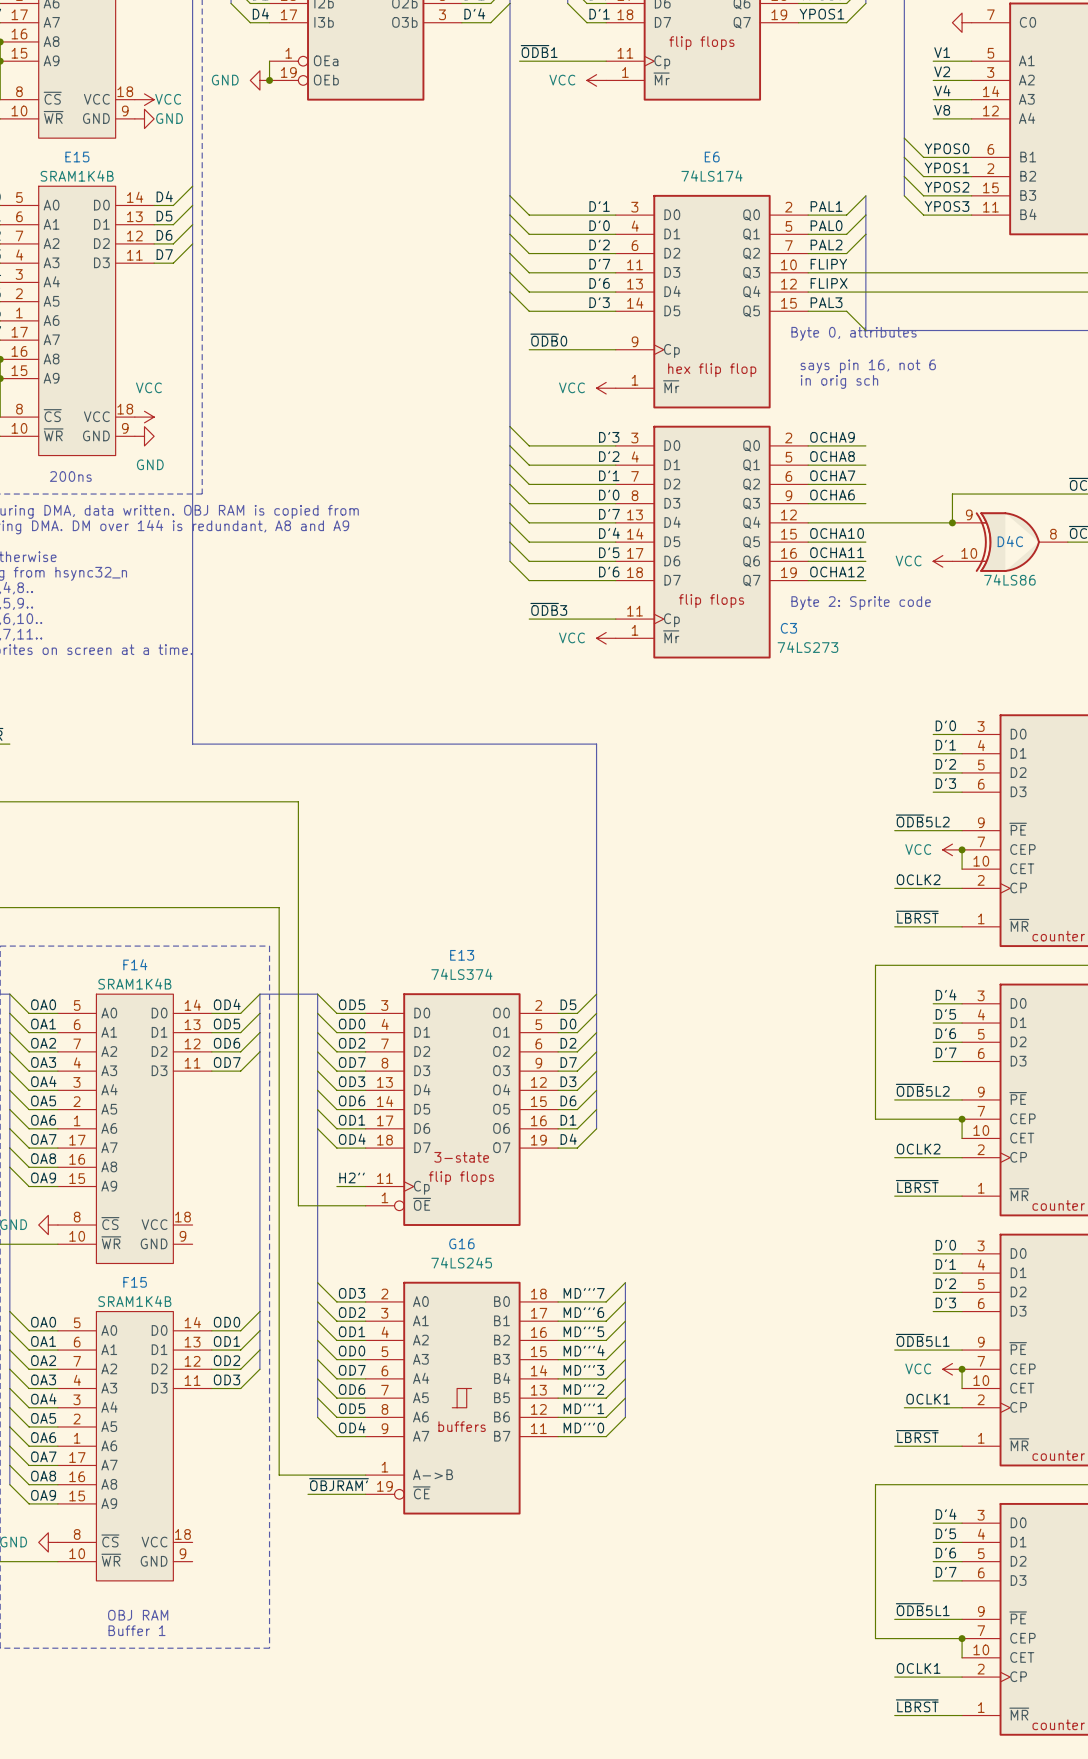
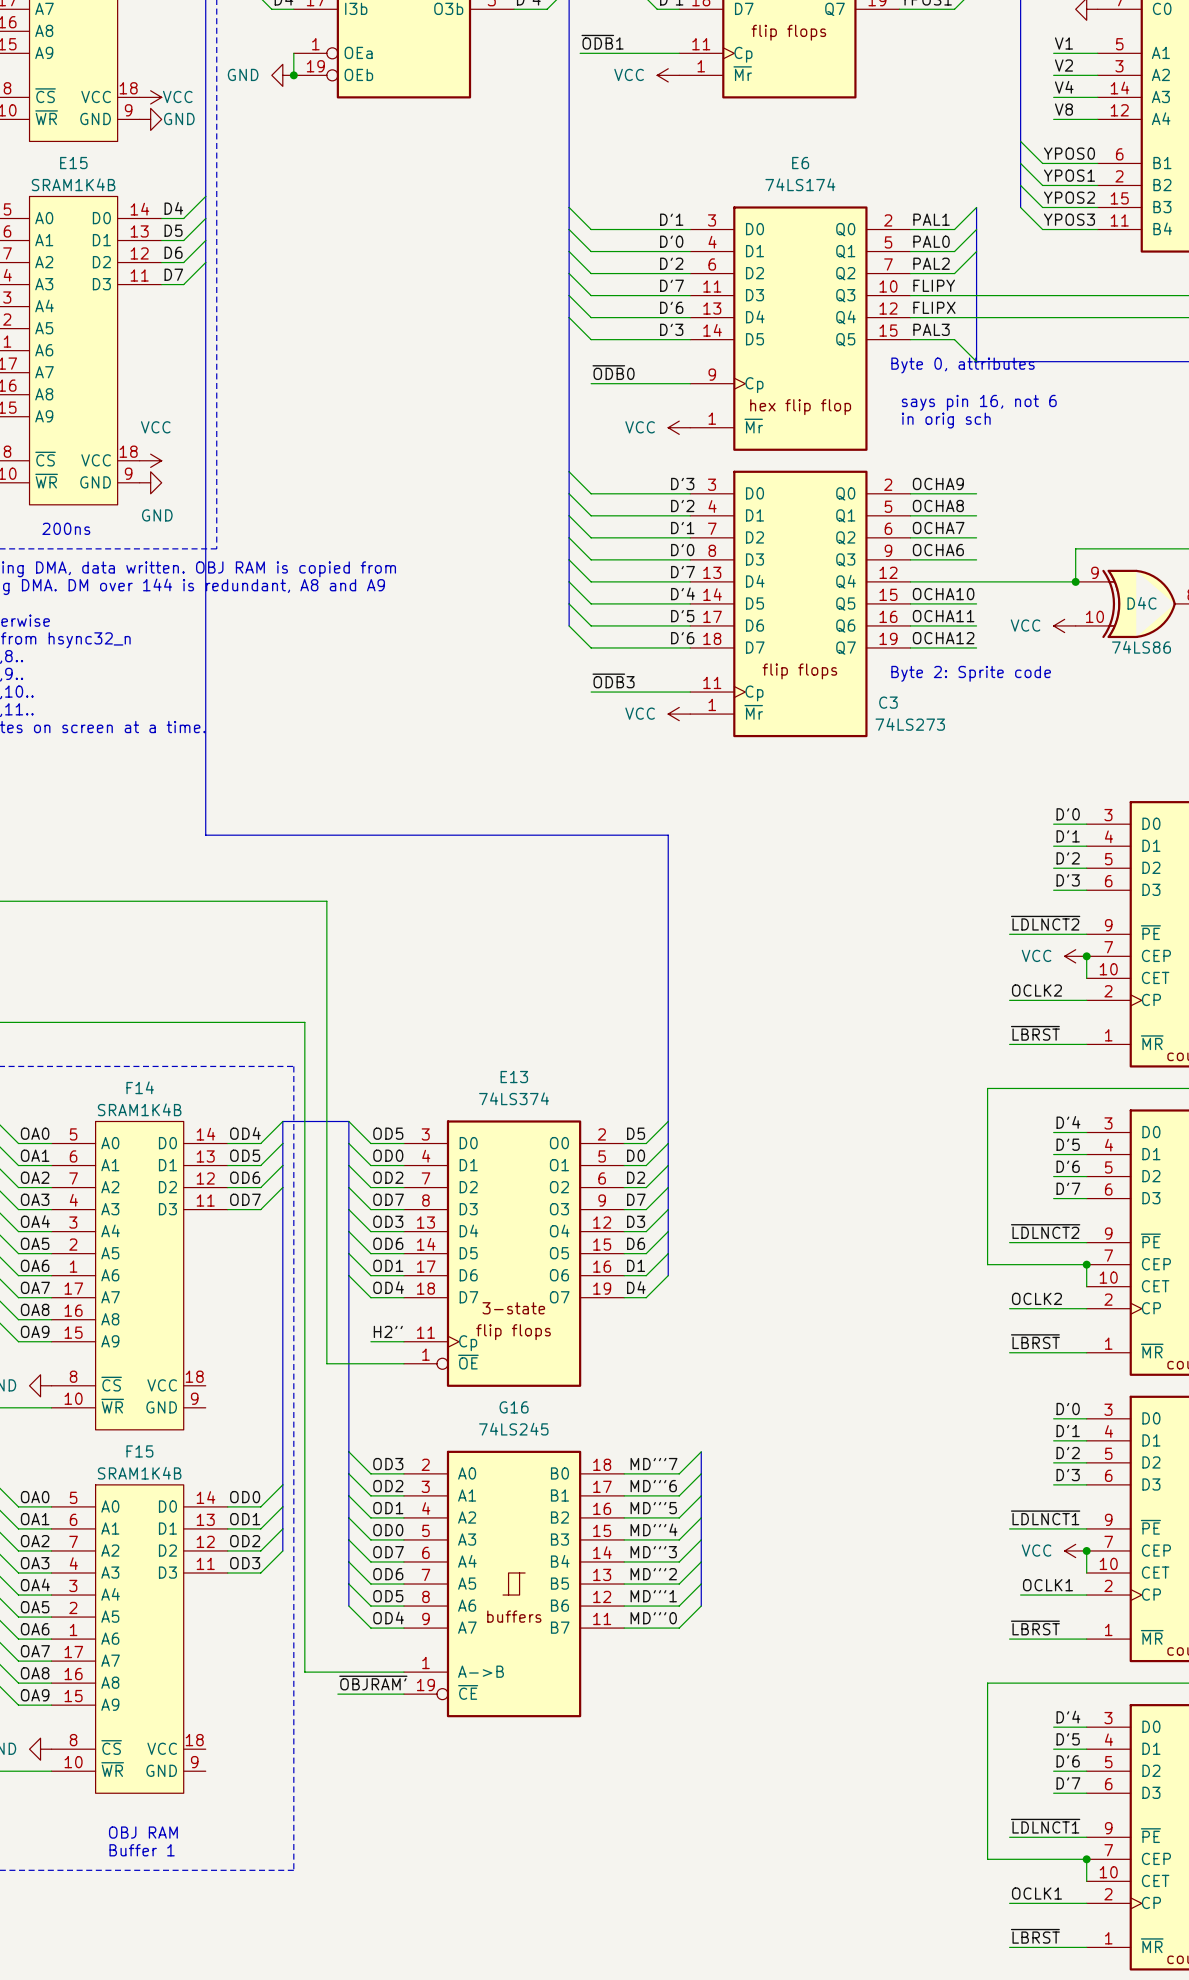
label: ~{ODB}5L2 (922, 820) -> ~{LDLNCT2} (1045, 923)
label: ~{ODB}5L2 (922, 1090) -> ~{LDLNCT2} (1045, 1231)
label: ~{ODB}5L1 (922, 1340) -> ~{LDLNCT1} (1045, 1517)
label: ~{ODB}5L1 (922, 1609) -> ~{LDLNCT1} (1045, 1826)

